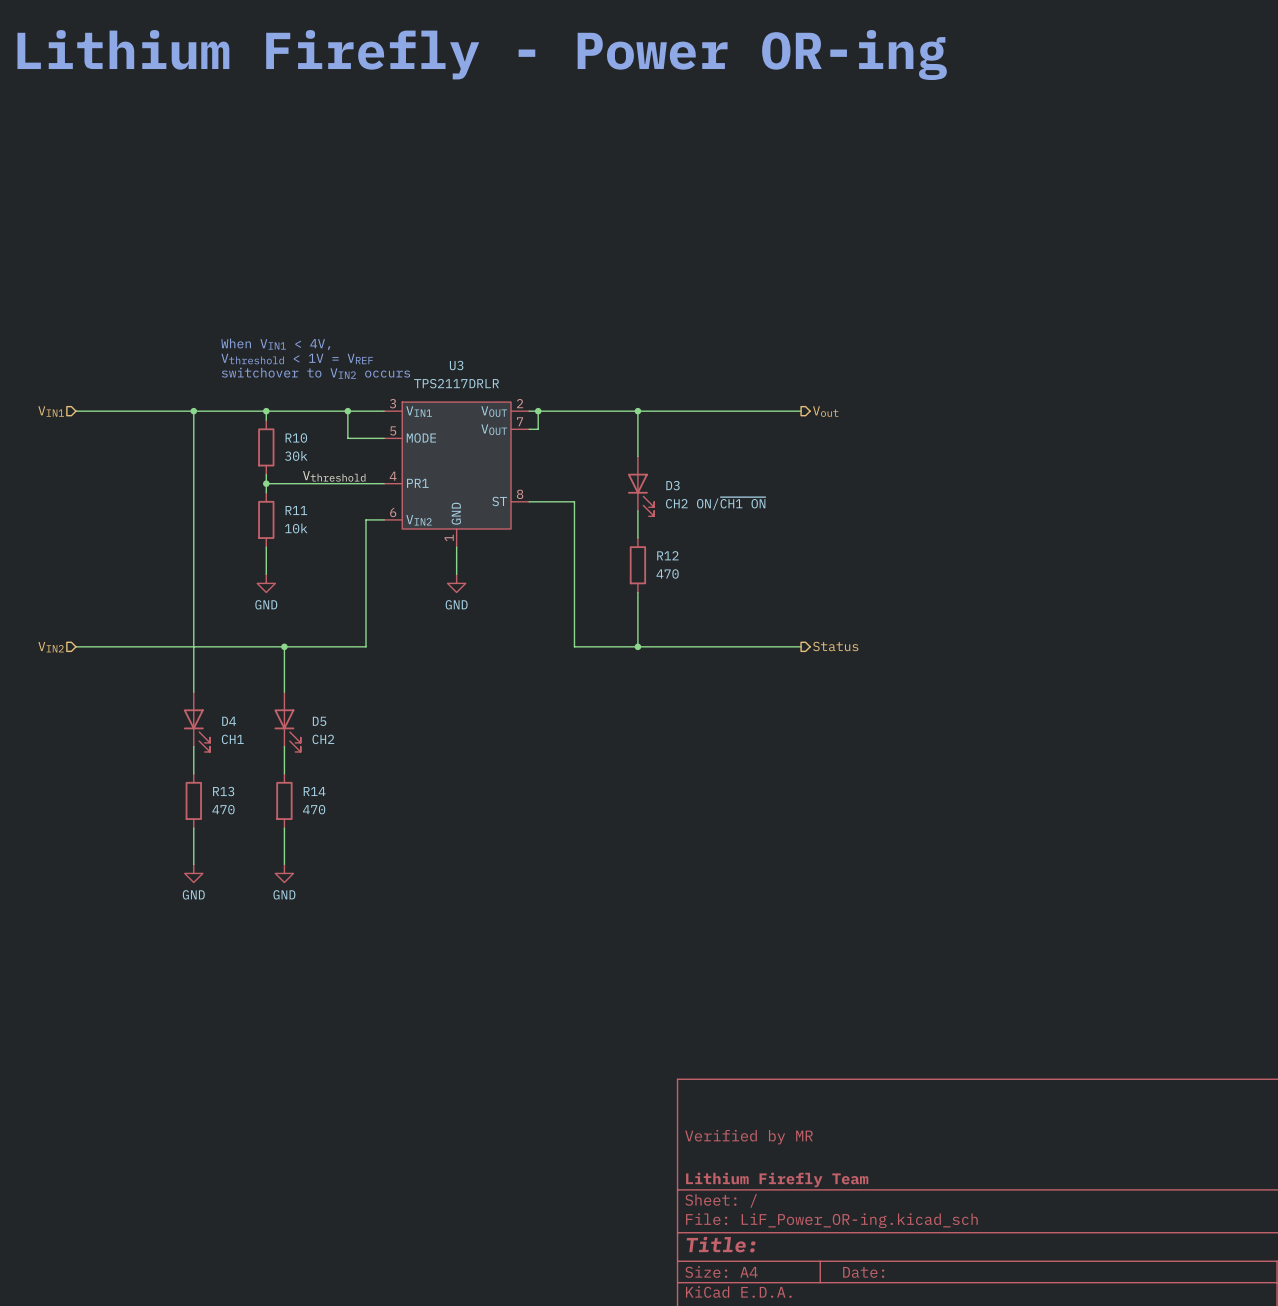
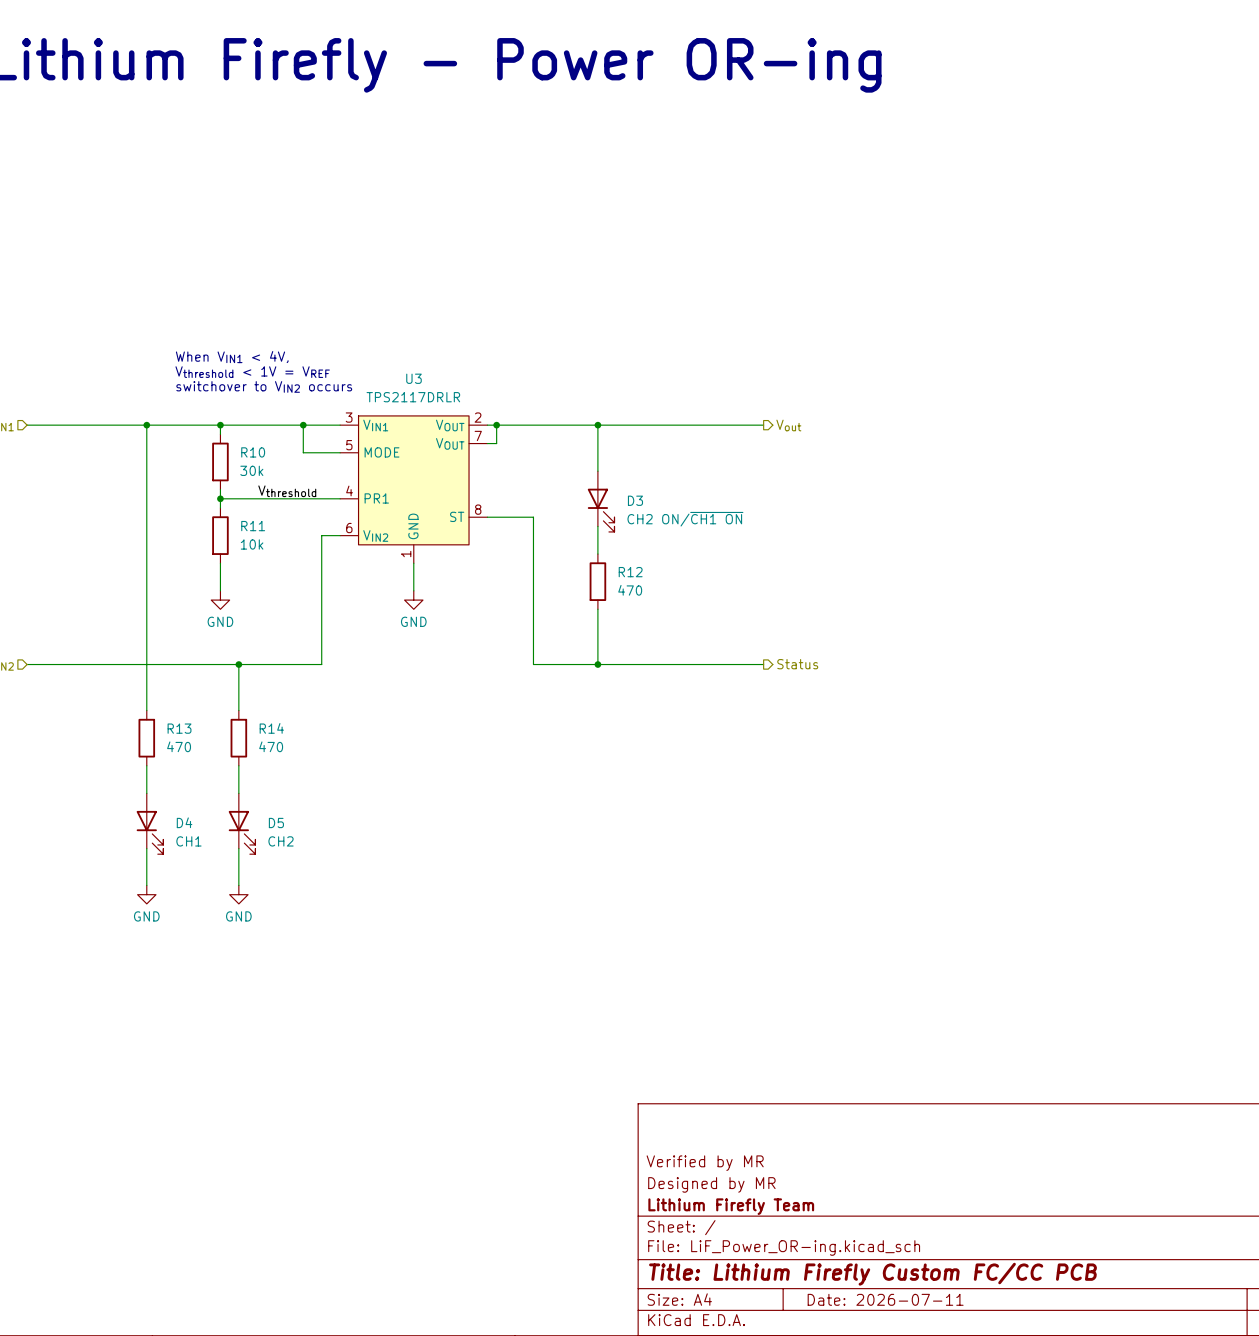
D4 position: (196, 722) -> (150, 823)
D5 position: (287, 722) -> (242, 823)
R13 position: (193, 800) -> (146, 738)
R14 position: (284, 800) -> (238, 738)
title block: none -> Designed by MR (711, 1184)
title block: Title: (721, 1244) -> Title: Lithium Firefly Custom FC/CC PCB (872, 1274)
title block: Date: (863, 1272) -> Date: 2026-07-11 (885, 1299)

